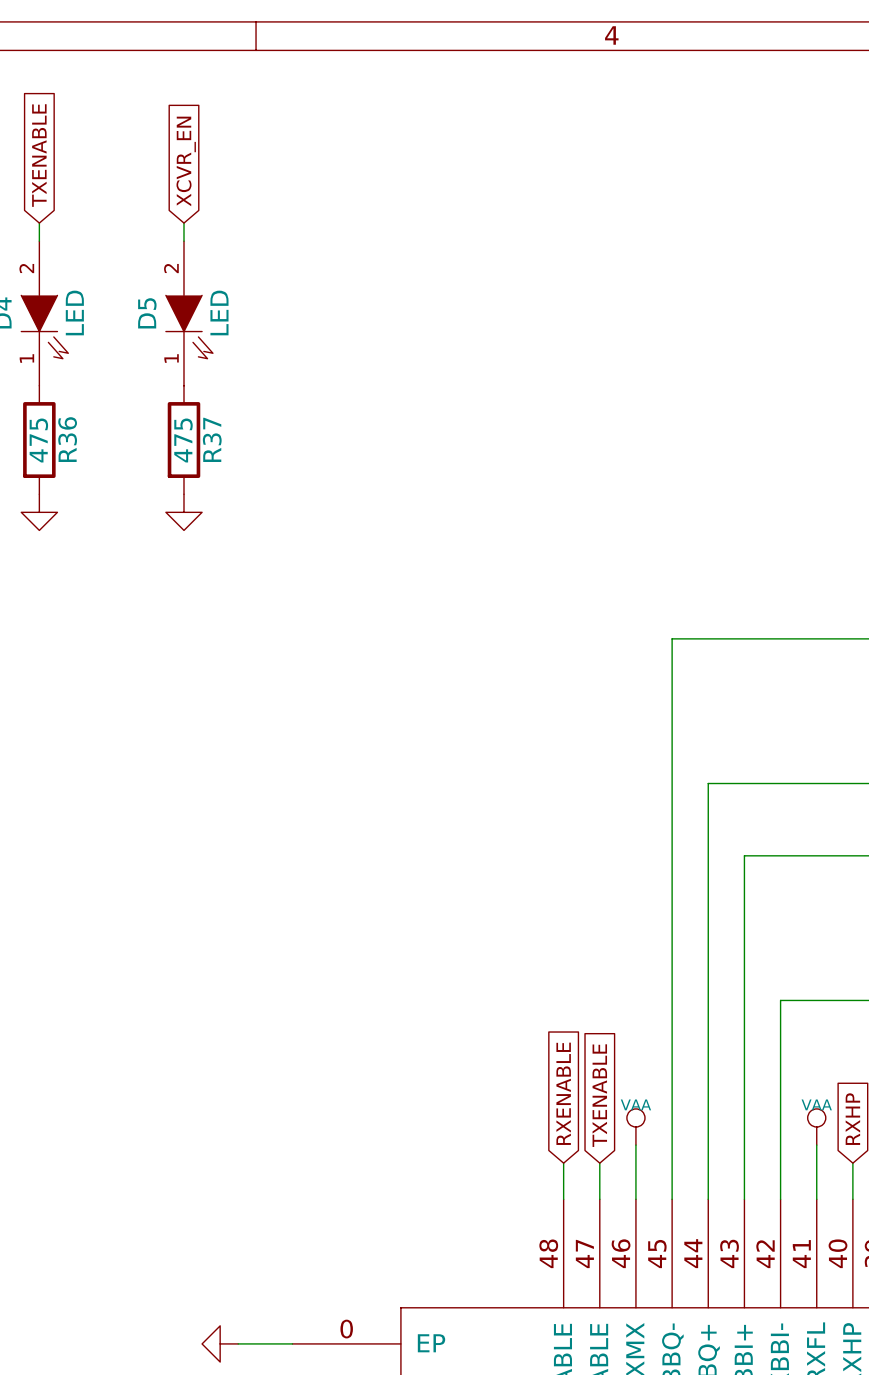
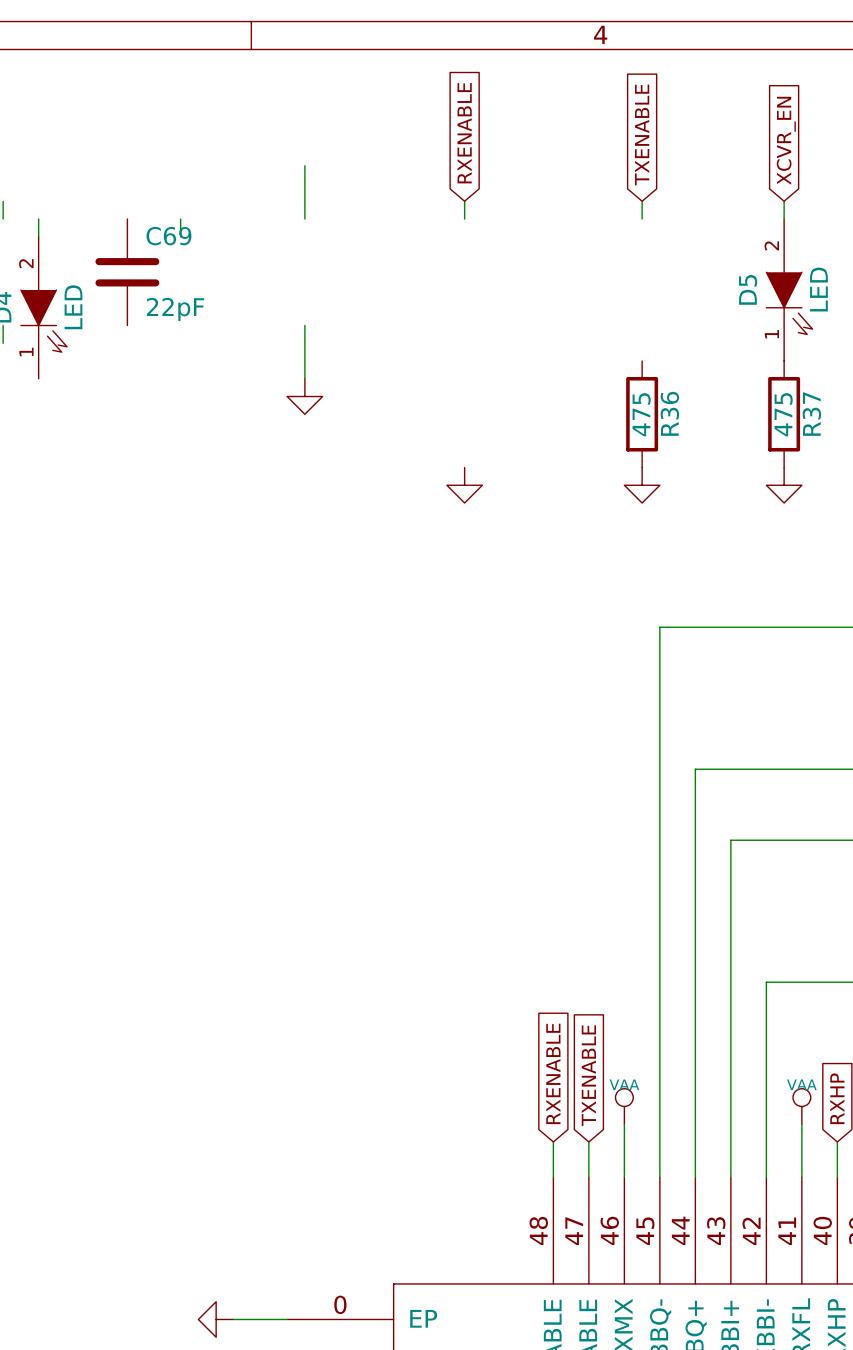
global label: none -> RXENABLE (464, 133)
global label: none -> TXENABLE (642, 134)
global label: none -> XCVR_EN (786, 140)
global label: TXENABLE (39, 155) -> none
global label: XCVR_EN (186, 161) -> none
wire: none -> (304, 165) (304, 219)
wire: none -> (3, 201) (3, 219)
wire: none -> (464, 201) (464, 219)
wire: none -> (642, 201) (642, 219)
wire: none -> (784, 201) (784, 219)
C69: none -> 22pF (127, 272)
D5 position: (189, 313) -> (789, 290)
wire: none -> (3, 325) (3, 343)
wire: none -> (304, 325) (304, 378)
power symbol: none -> (304, 396)
R36 position: (39, 440) -> (642, 414)
R37 position: (183, 440) -> (784, 414)
power symbol: none -> (464, 485)
power symbol: none -> (642, 485)
power symbol: none -> (784, 485)
power symbol: (39, 512) -> none
power symbol: (183, 512) -> none

